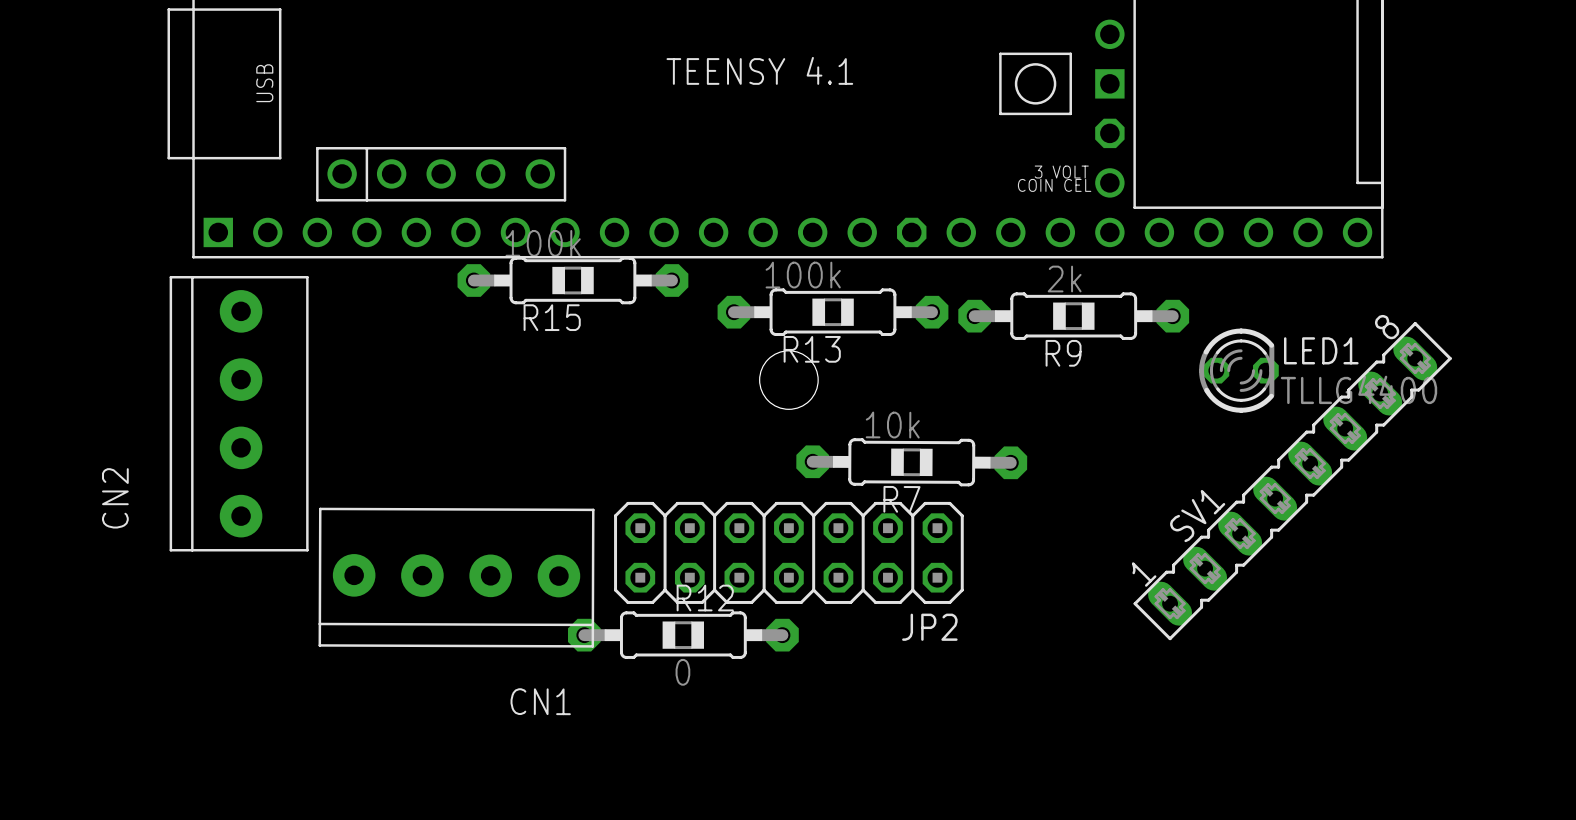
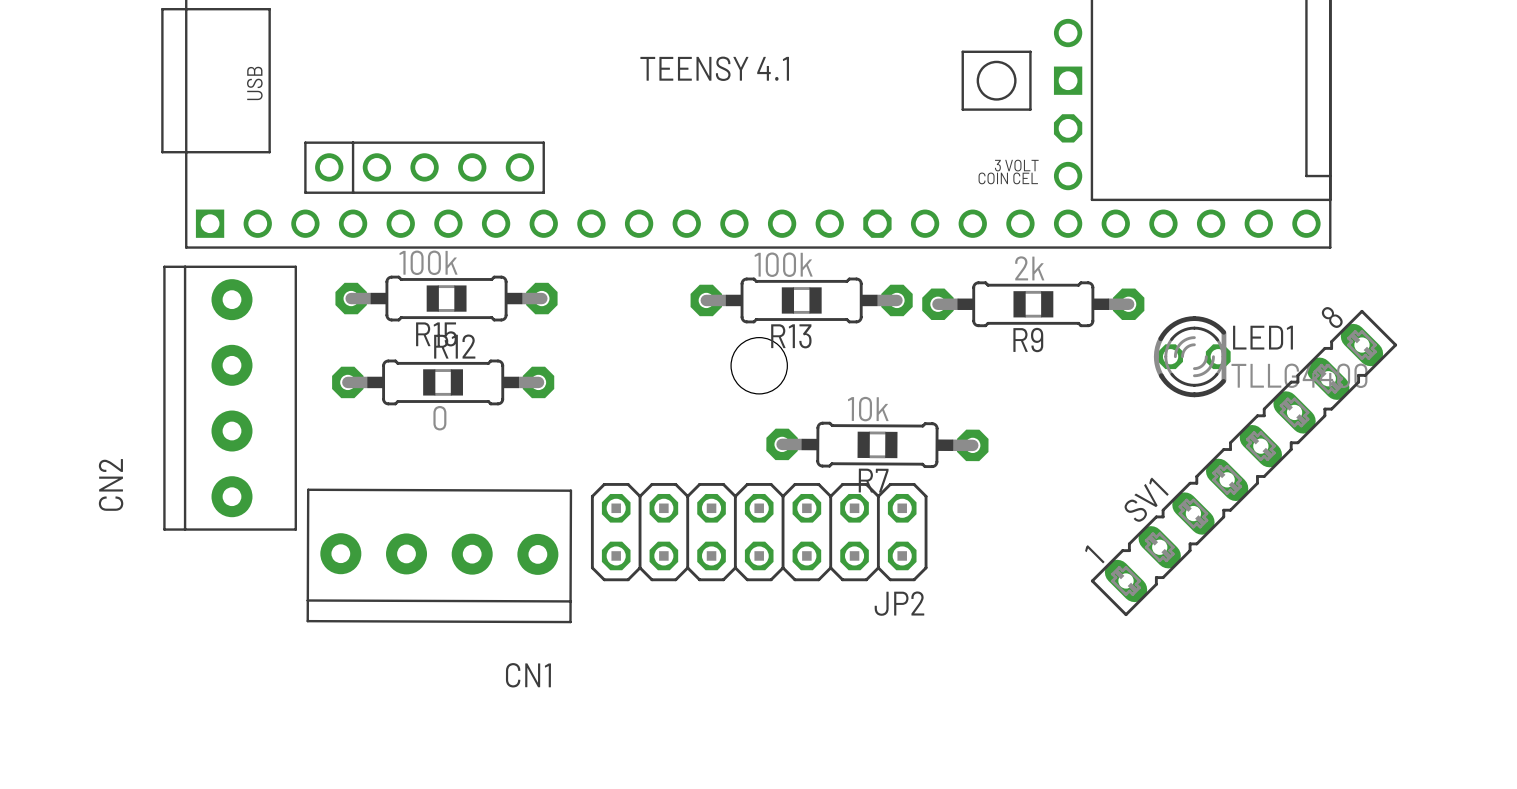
R15 position: (572, 280) -> (446, 298)
R12 position: (683, 635) -> (443, 382)

